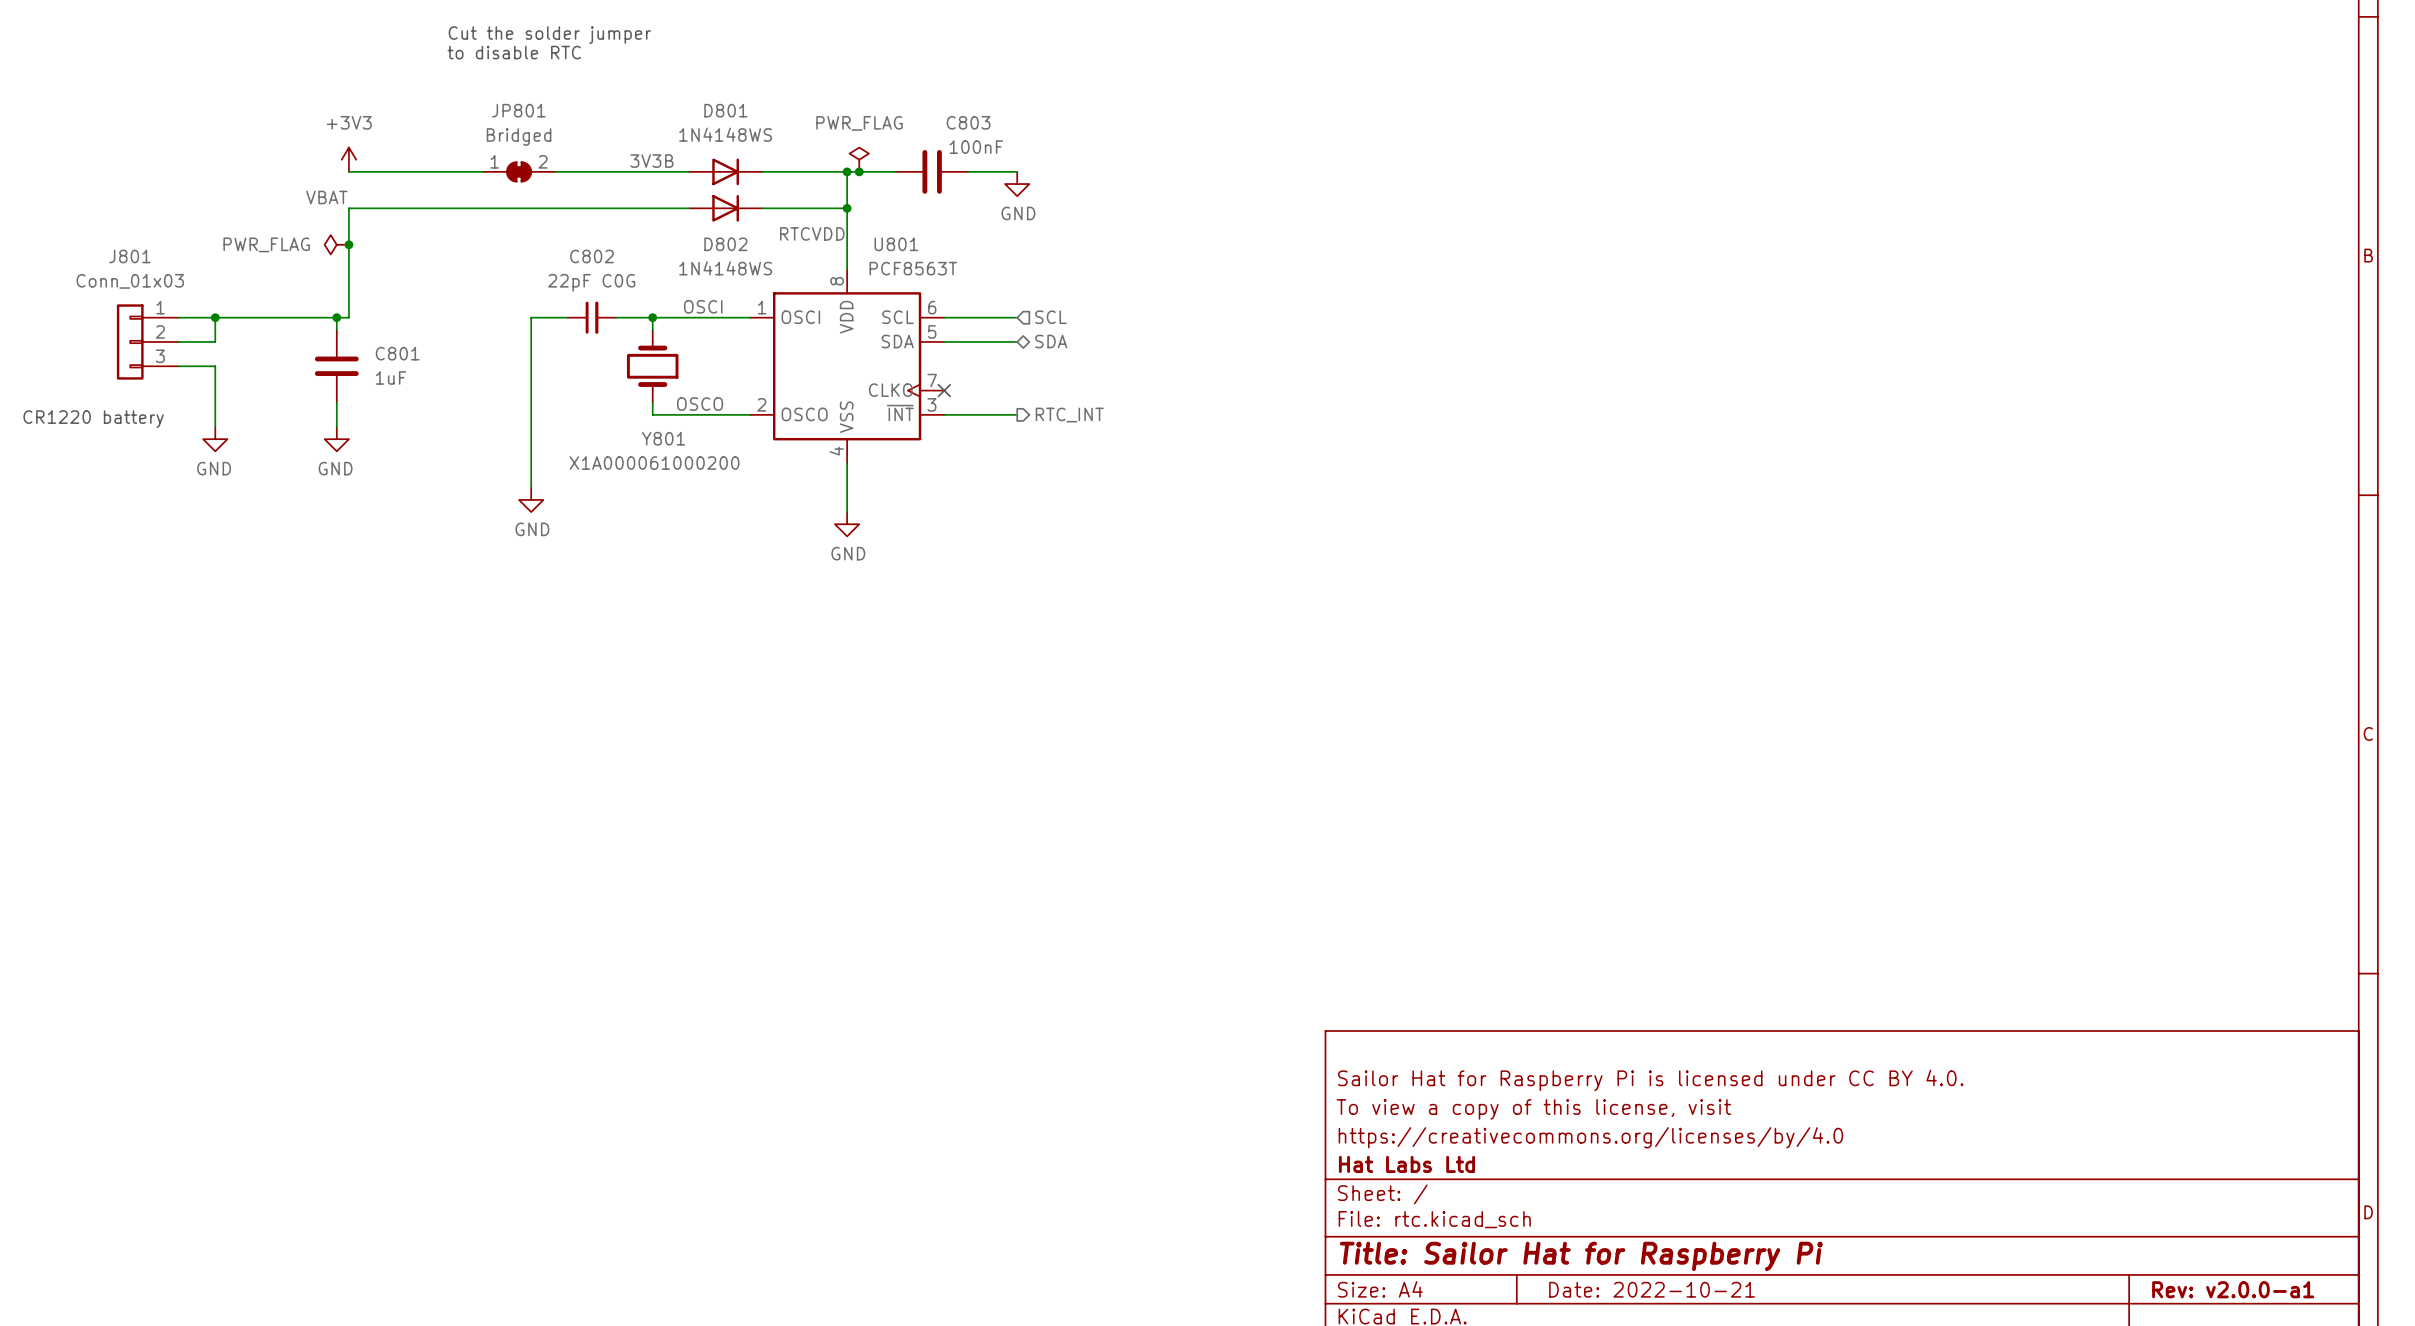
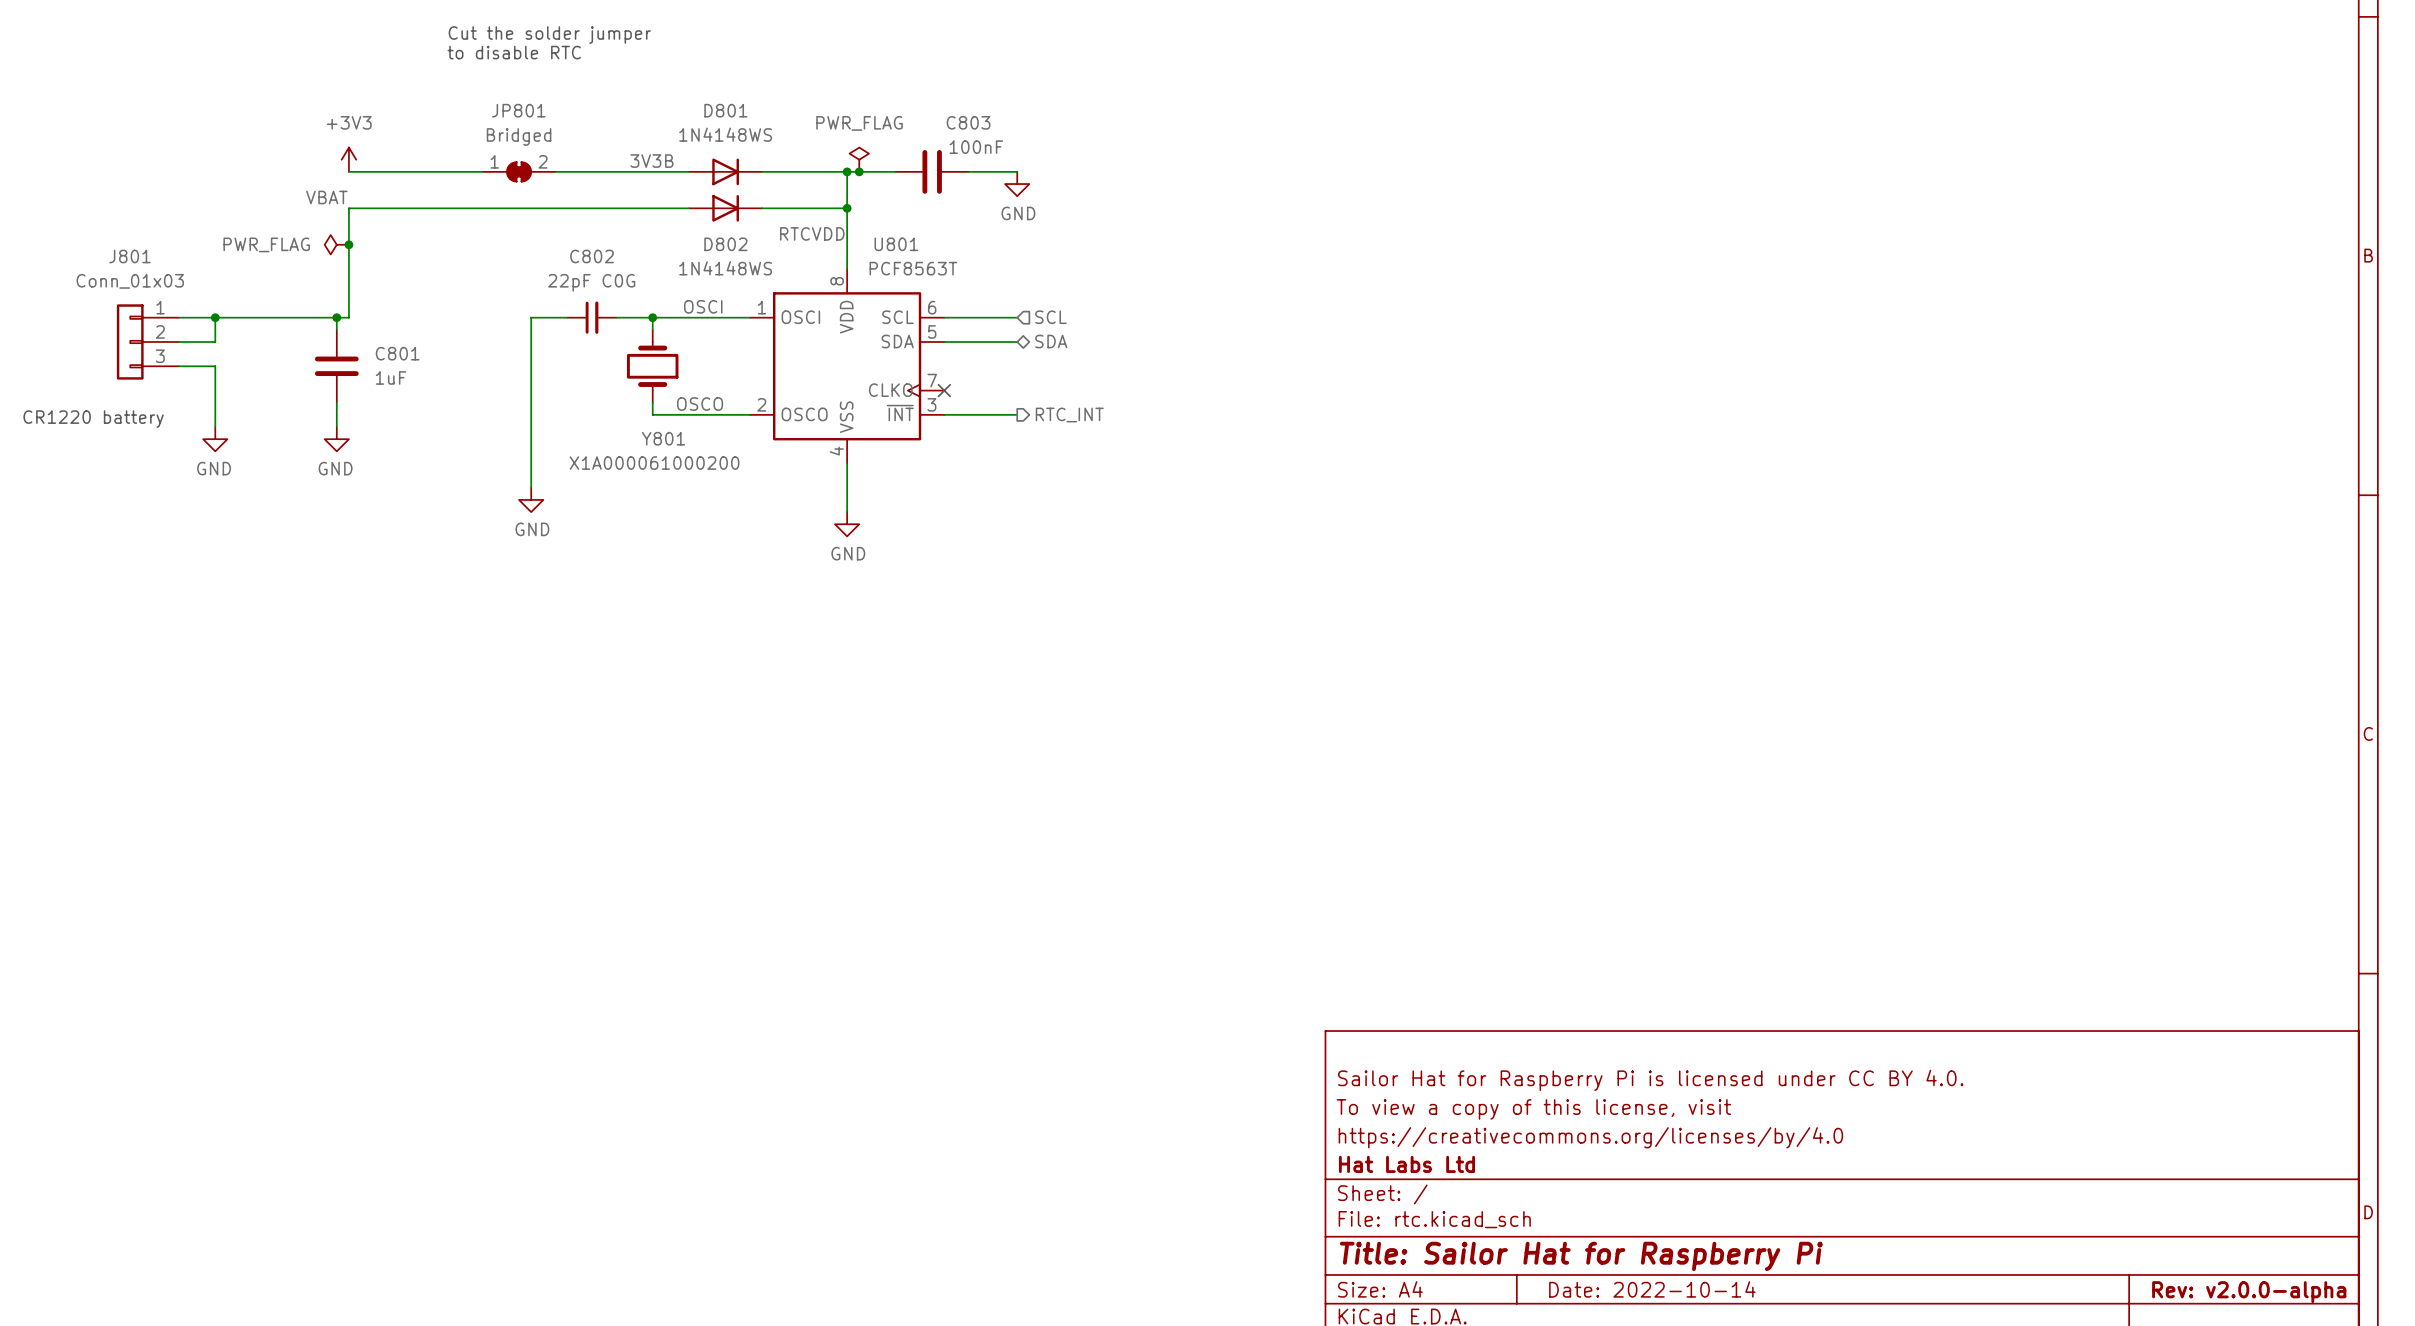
title block: Date: 2022-10-21 (1652, 1289) -> Date: 2022-10-14 (1652, 1289)
title block: Rev: v2.0.0-a1 (2233, 1289) -> Rev: v2.0.0-alpha (2249, 1292)

